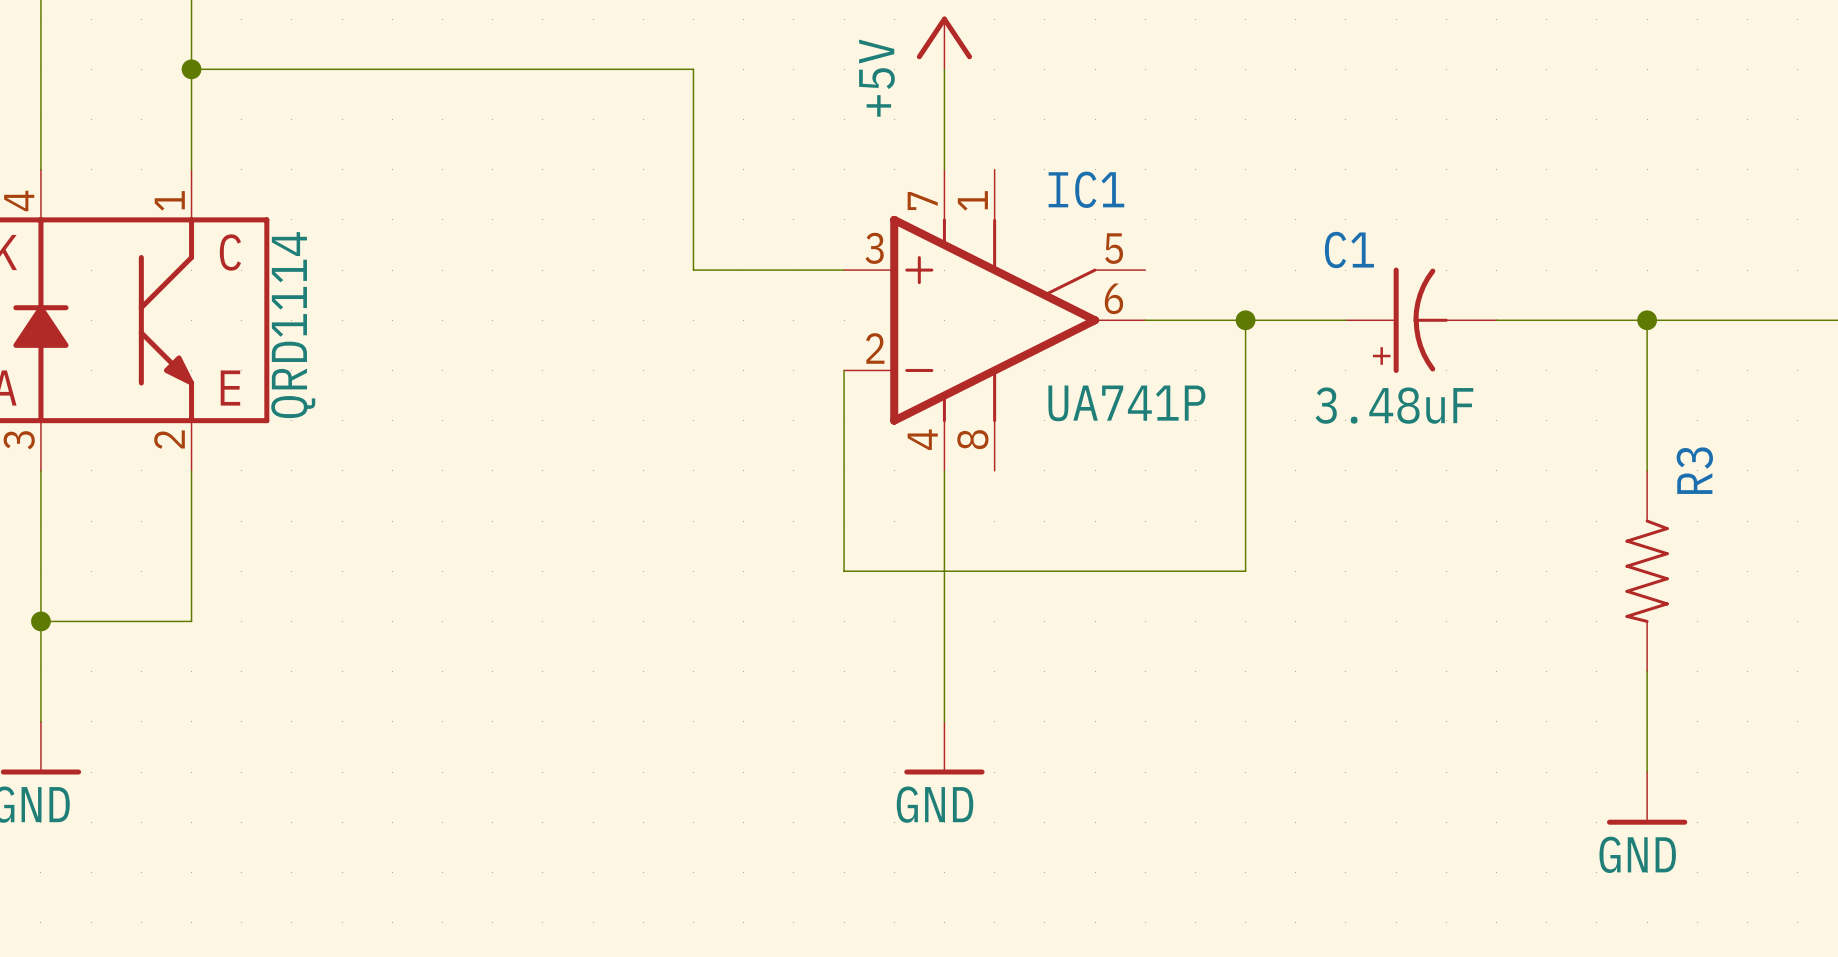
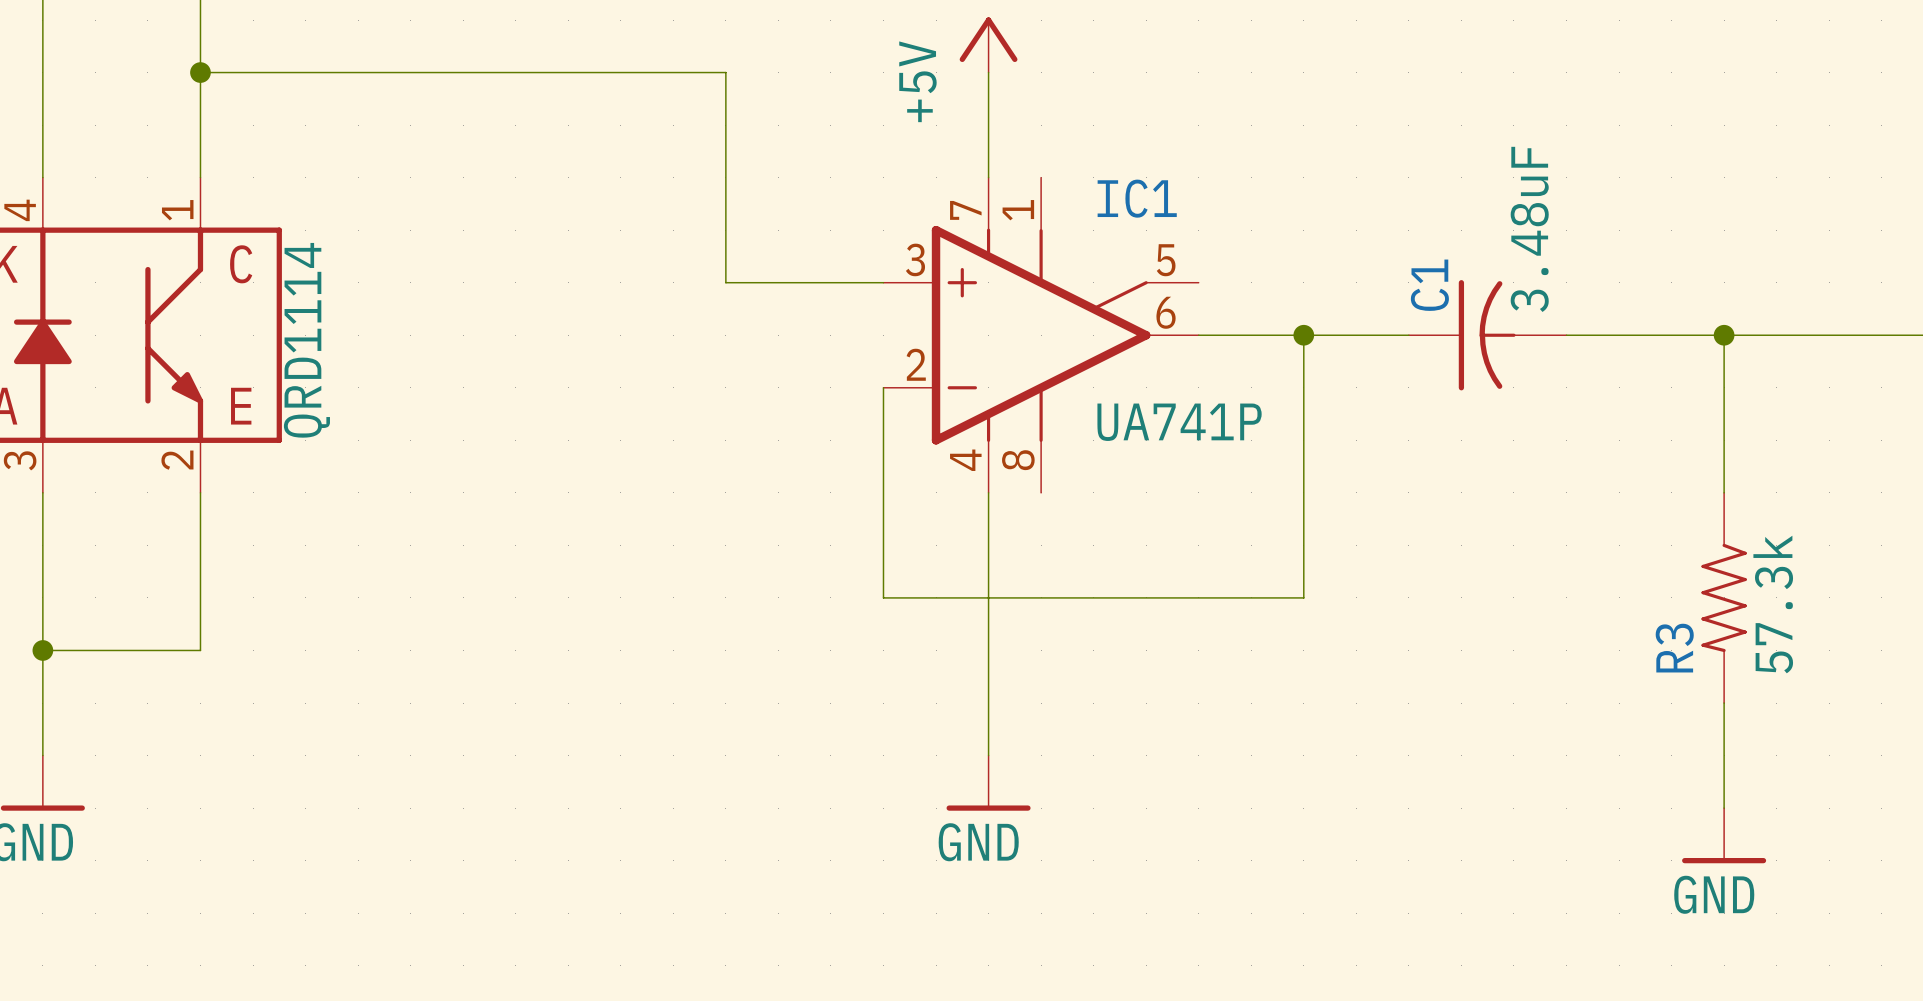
C1 symbol: [1345, 267, 1497, 373] -> [1408, 280, 1567, 391]
C1 value position: 3.48uF (1394, 405) -> 3.48uF (1529, 229)
R3 name position: R3 (1694, 470) -> R3 (1674, 648)
R3 value: none -> 57.3k (1773, 604)

